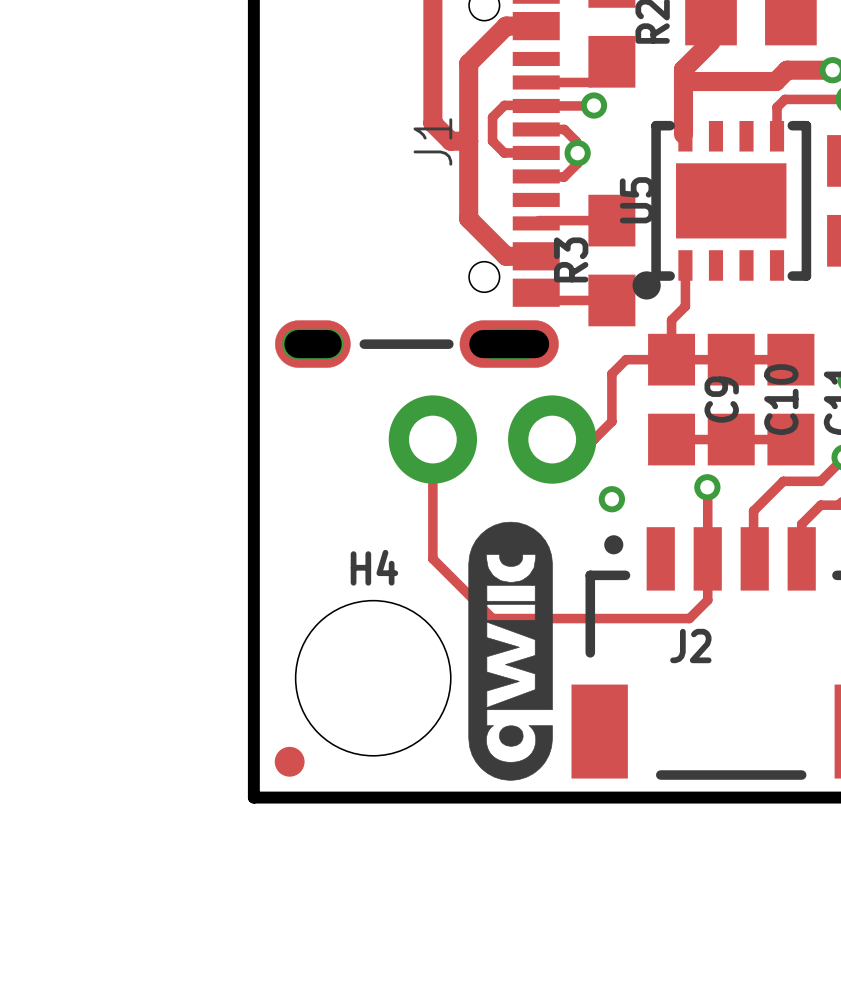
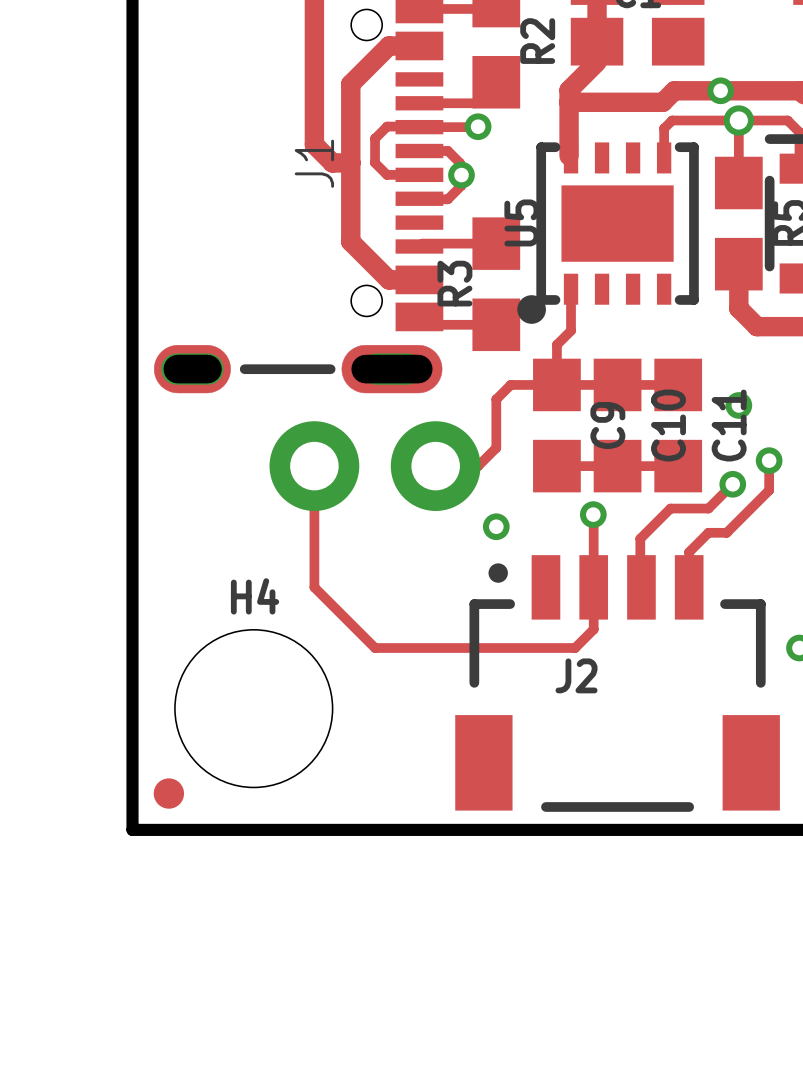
drawing: [468, 521, 553, 781] -> none

